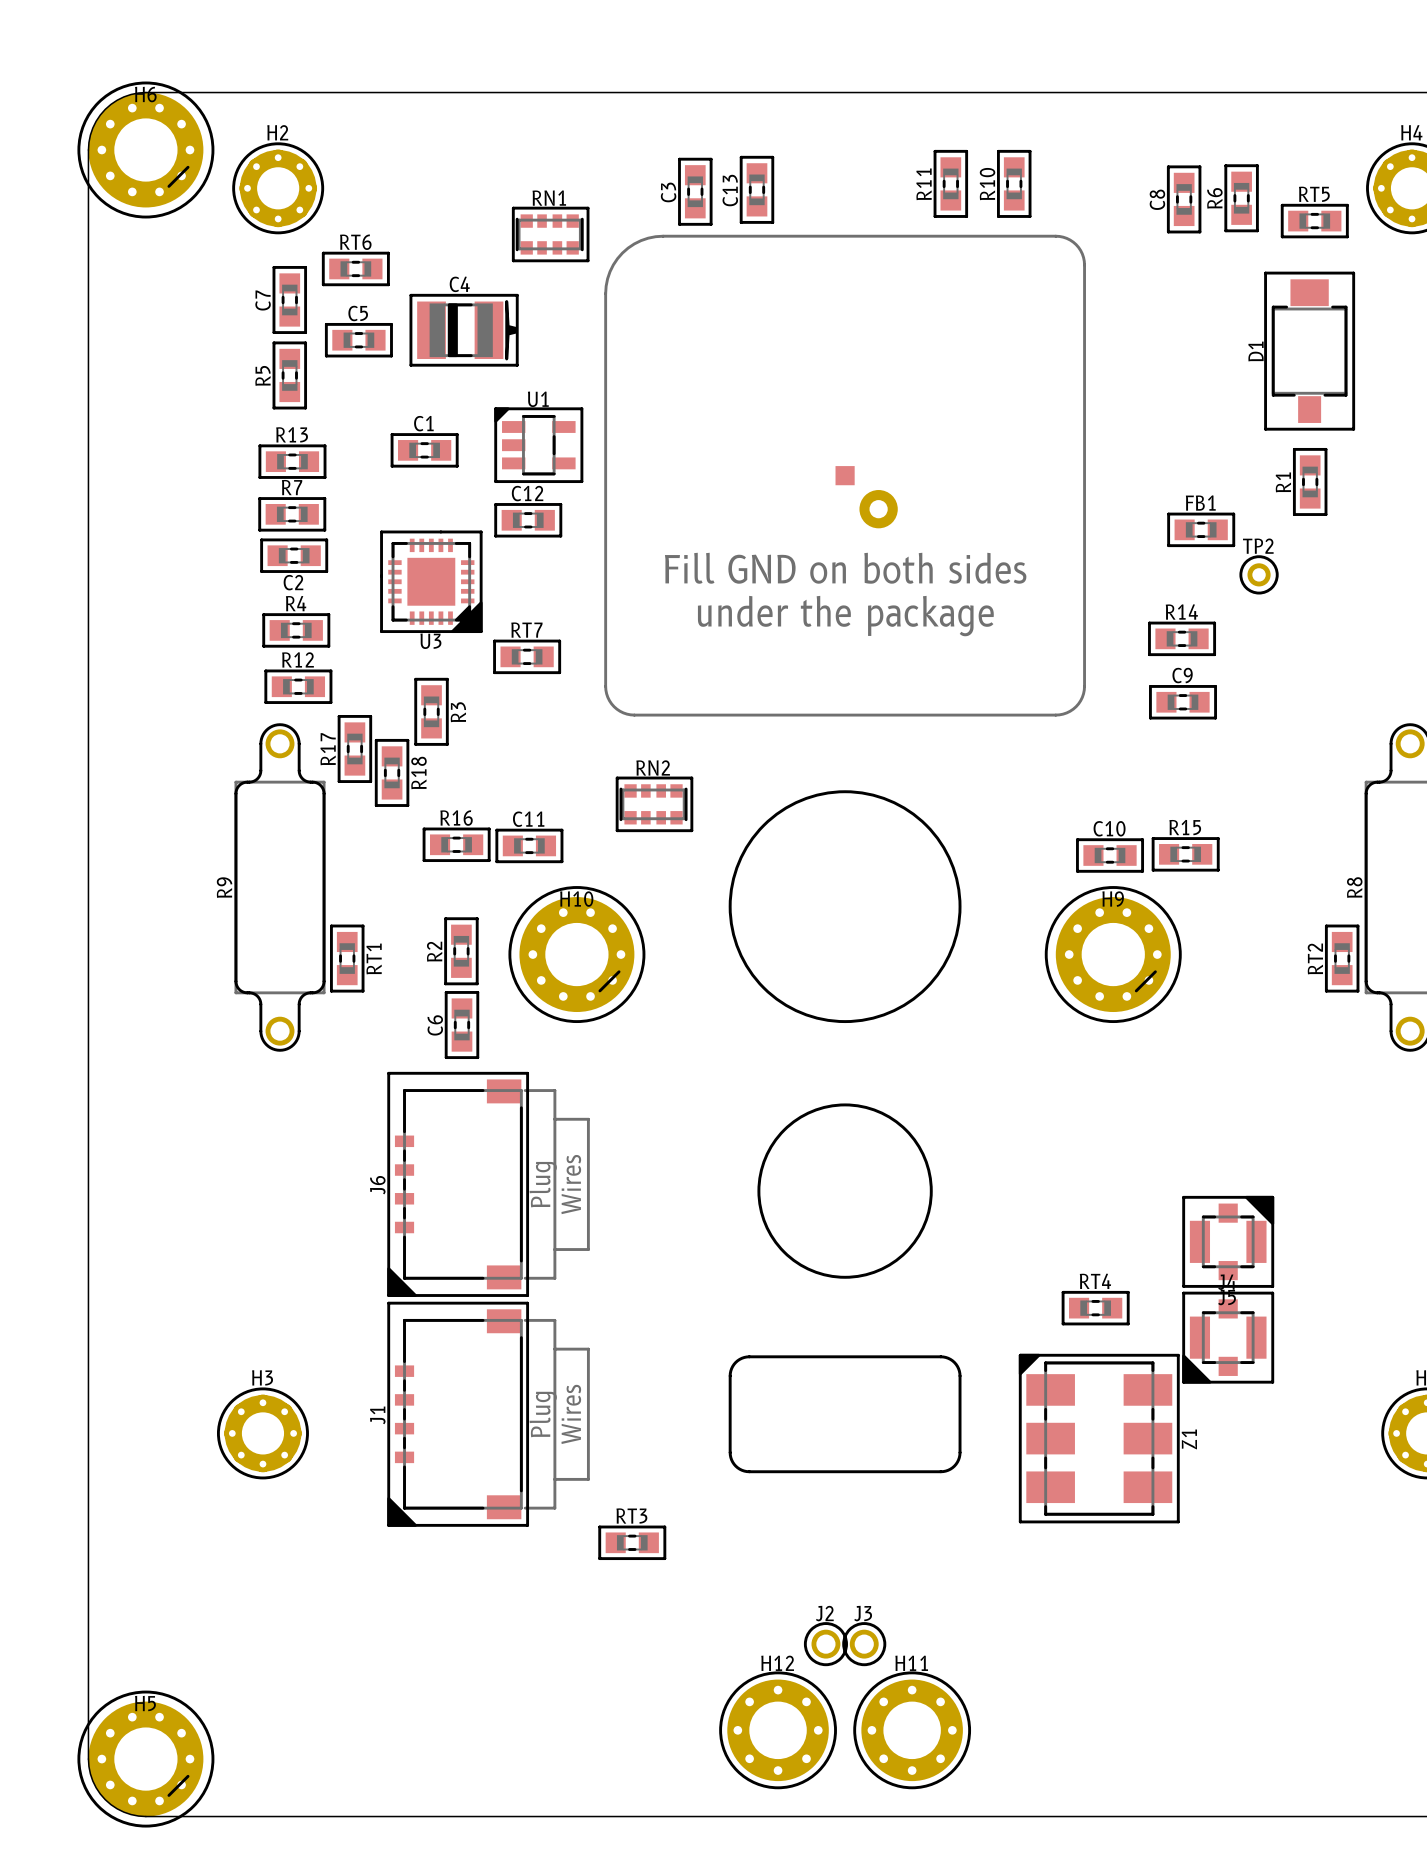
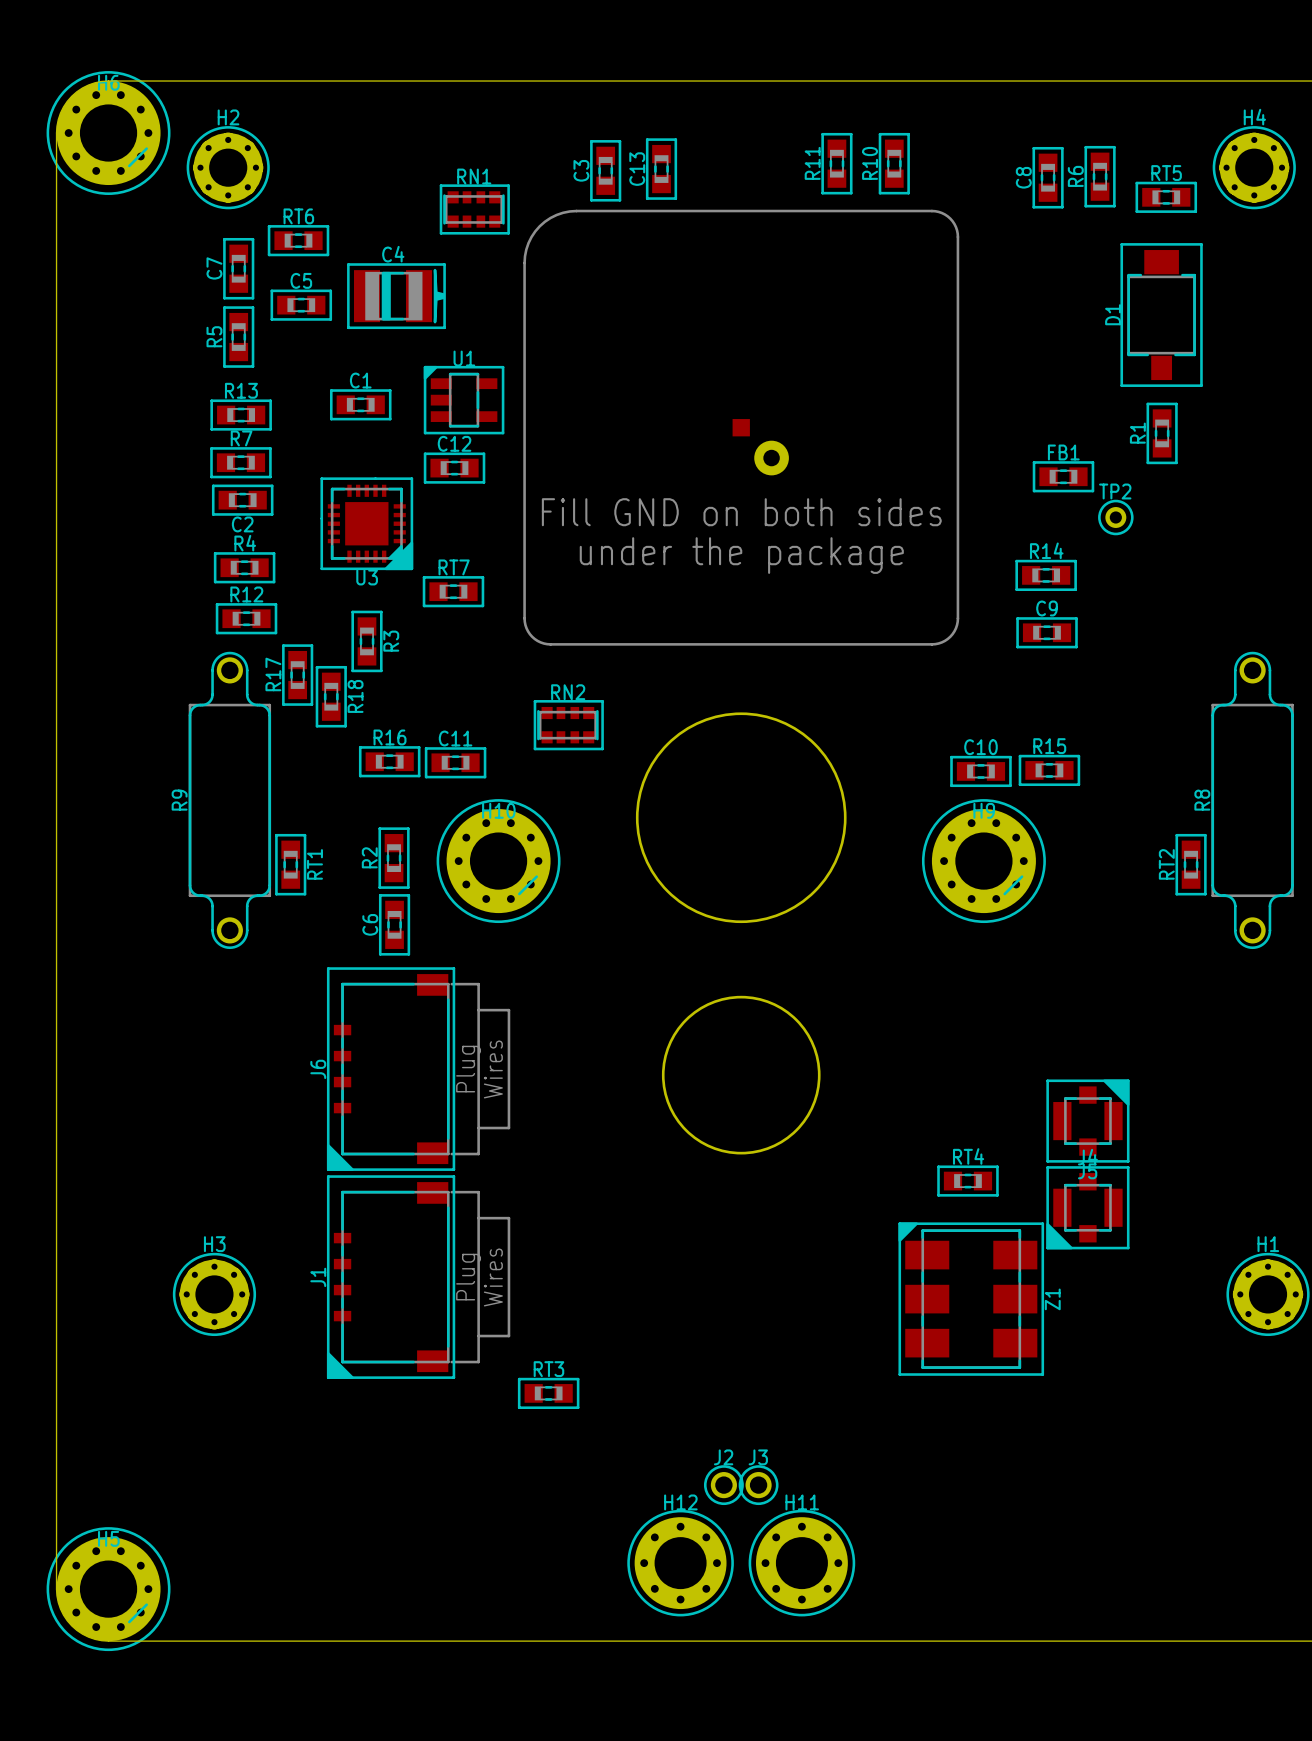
board edge: (749, 1356) (940, 1356) (950, 1359) (956, 1364) (959, 1373) (960, 1452) (957, 1462) (950, 1469) (940, 1471) (749, 1471) (739, 1469) (734, 1464) (730, 1455) (730, 1373) (737, 1360) (749, 1356) -> none

